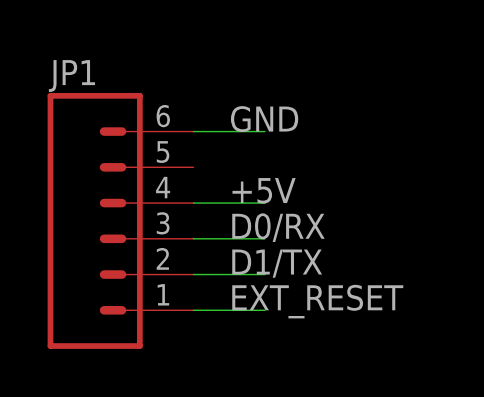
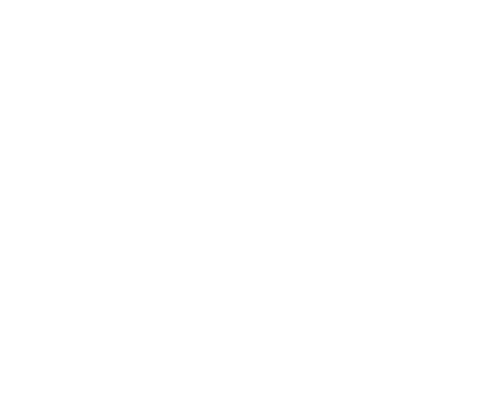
label: GND (264, 119) -> none
wire: (193, 131) (264, 131) -> none
label: +5V (264, 190) -> none
wire: (193, 203) (264, 203) -> none
JP1: (120, 220) -> none
label: D0/RX (278, 227) -> none
wire: (193, 238) (264, 238) -> none
label: D1/TX (277, 263) -> none
wire: (193, 274) (264, 274) -> none
label: EXT_RESET (317, 301) -> none
wire: (193, 310) (264, 310) -> none

